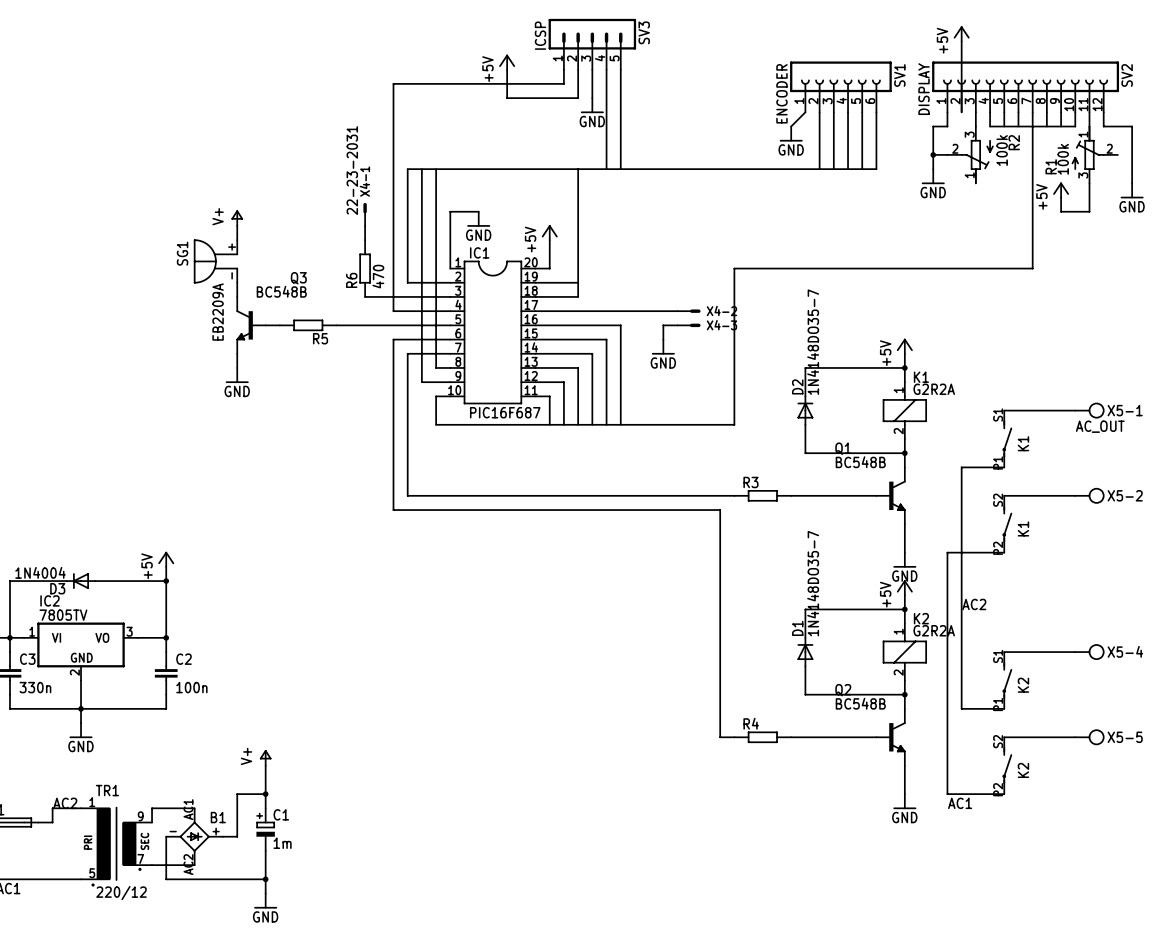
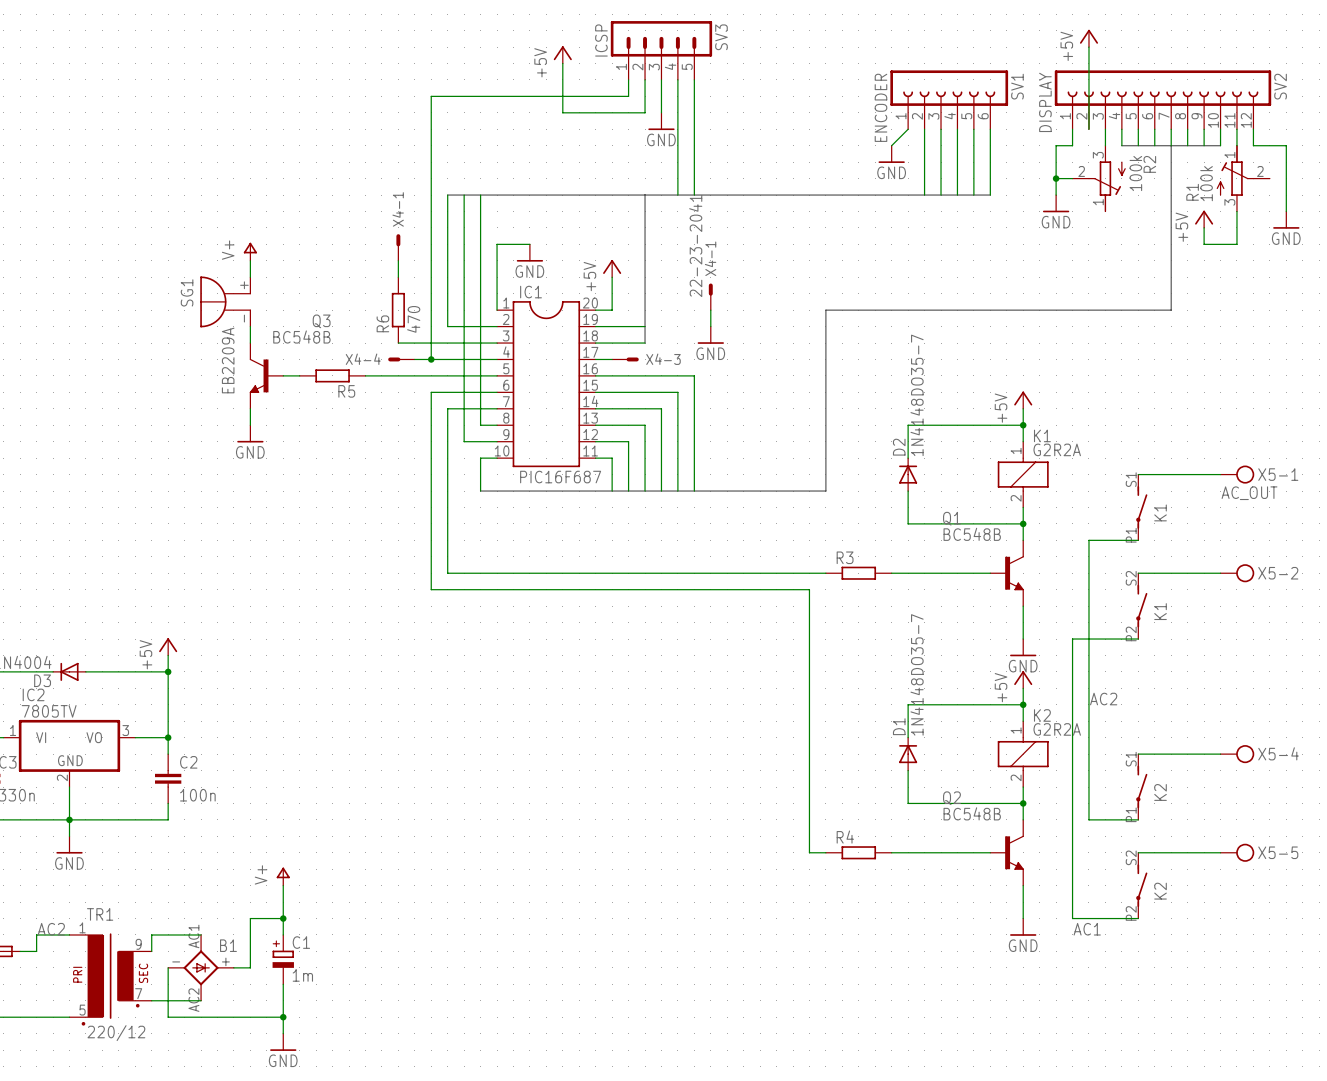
power symbol position: +5V (507, 62) -> +5V (562, 54)
X4-1 value: 22-23-2031 (352, 170) -> none
X4-1: none -> 22-23-2041 (710, 296)
wire: none -> (710, 310) (710, 326)
X4-4: none -> (401, 359)
wire: none -> (414, 359) (431, 359)
junction: none -> (431, 359)
wire: (549, 311) (677, 311) -> none
X4-2: (689, 311) -> none
wire: (677, 325) (663, 325) (663, 339) -> none
X4-3 position: (689, 325) -> (625, 359)
power symbol position: GND (663, 347) -> GND (710, 335)

